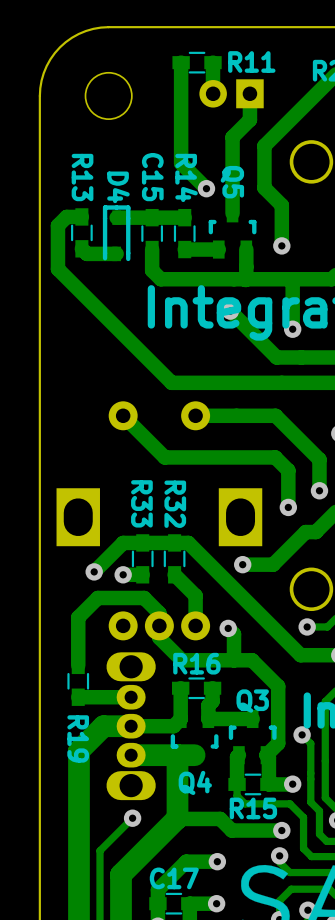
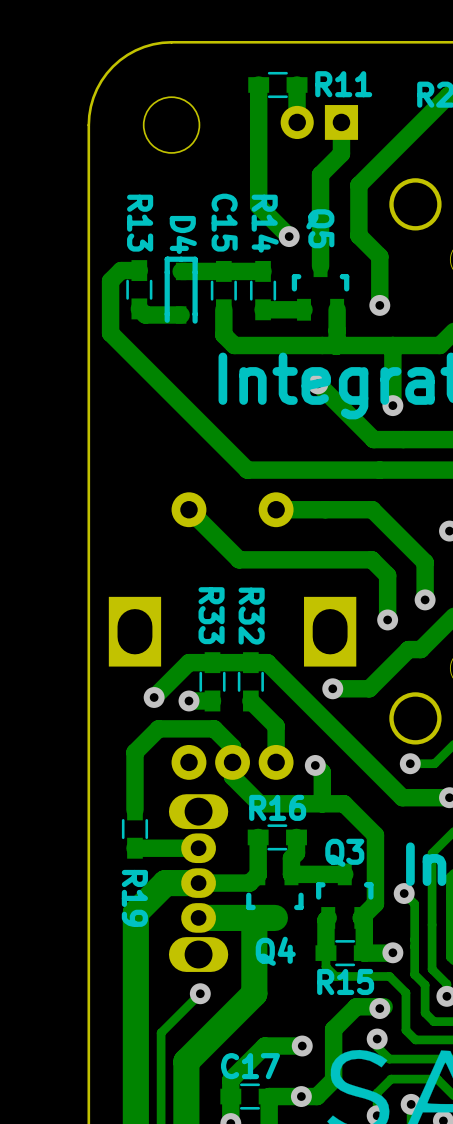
track: (176, 818) (220, 818) (231, 830) (281, 830) -> none
track: none -> (384, 1006) (356, 1006) (333, 1029) (333, 1079) (317, 1096) (301, 1096)

